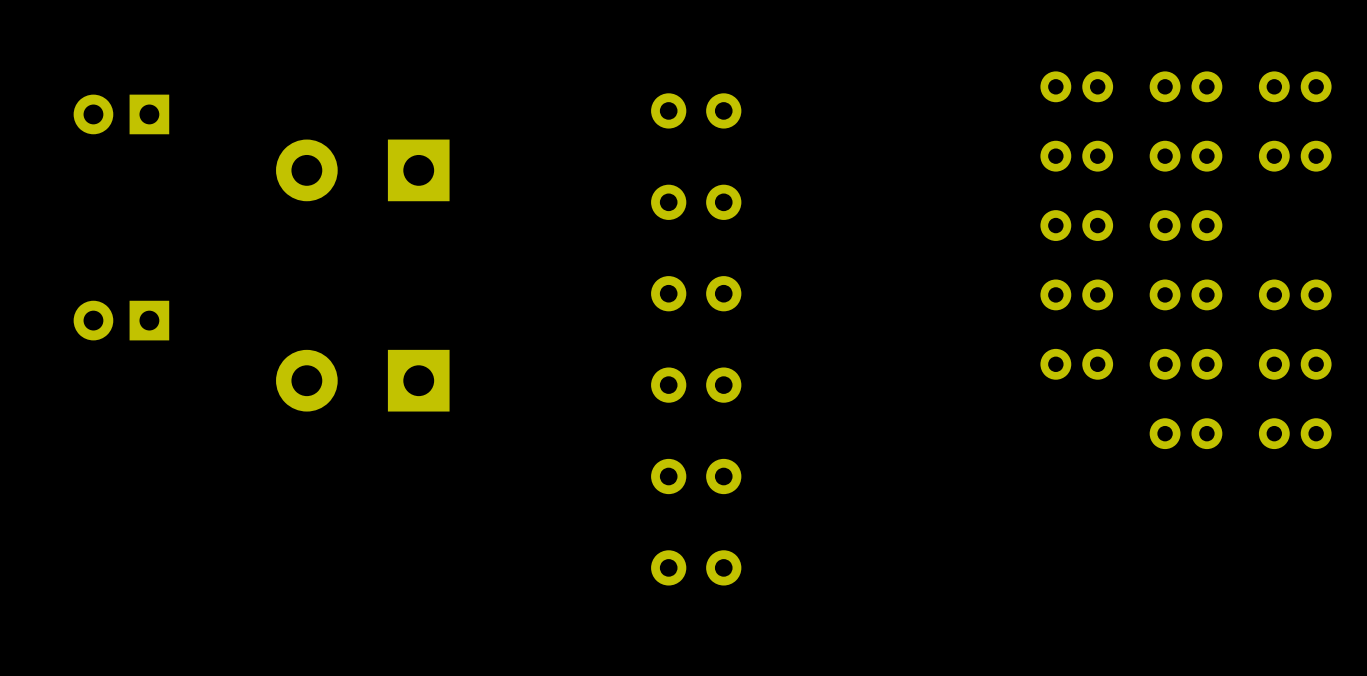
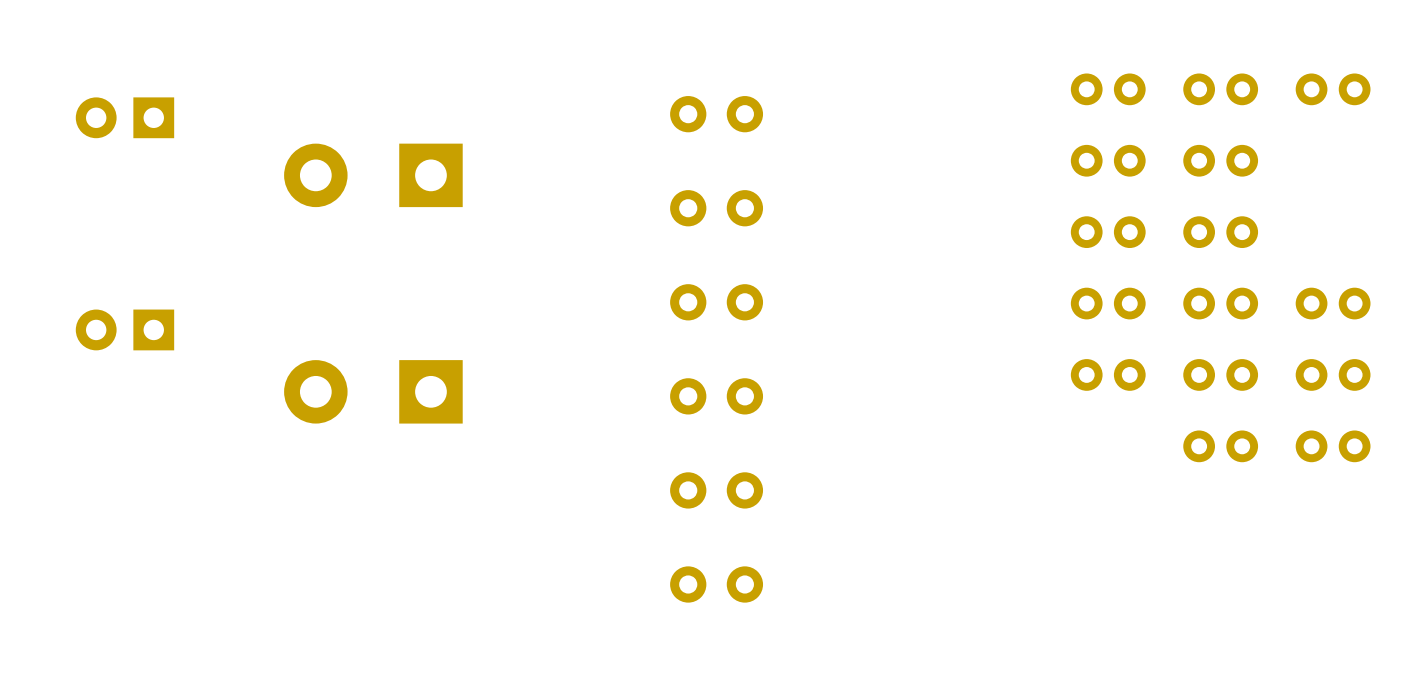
part: (1295, 156) -> none

